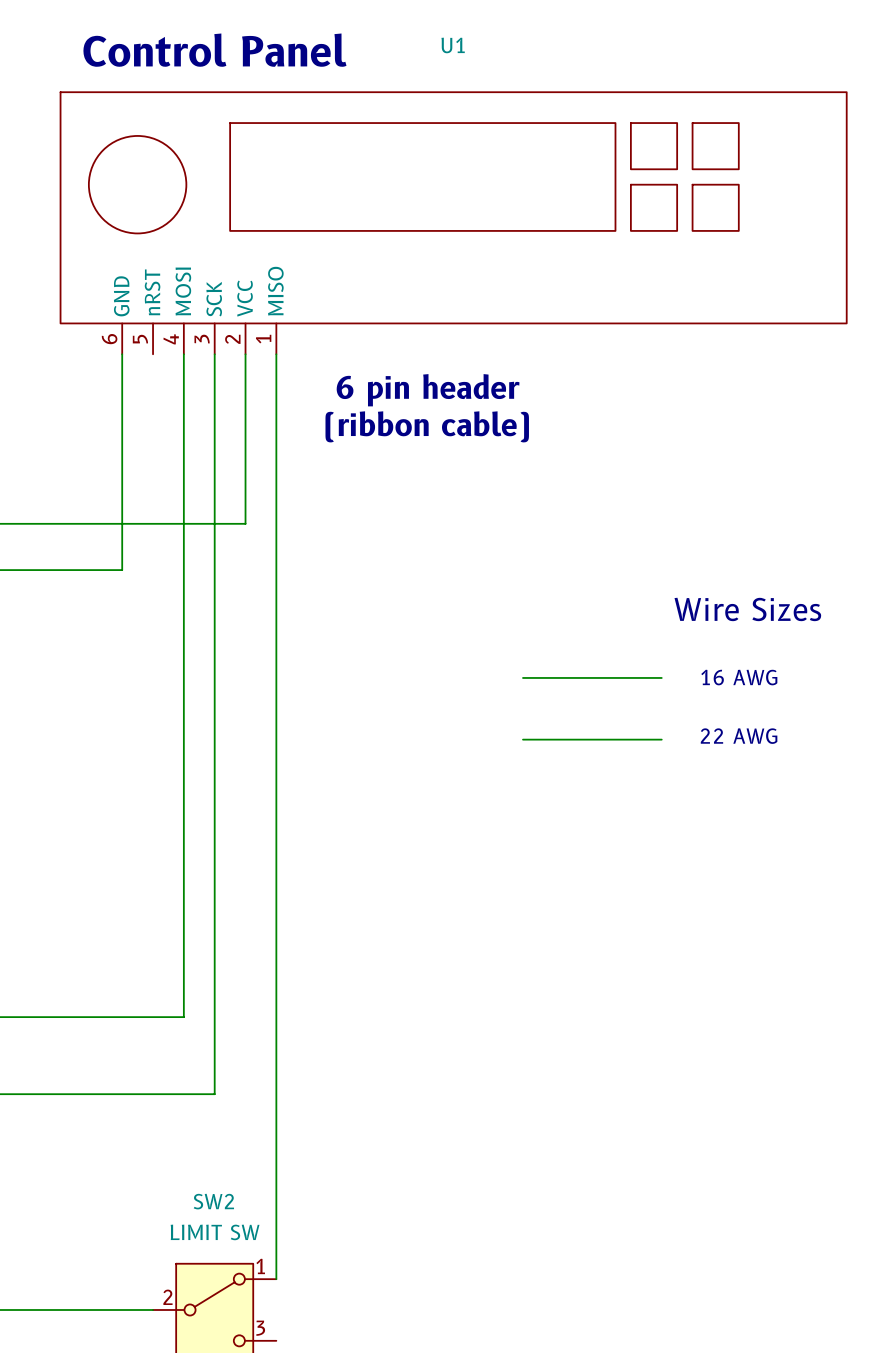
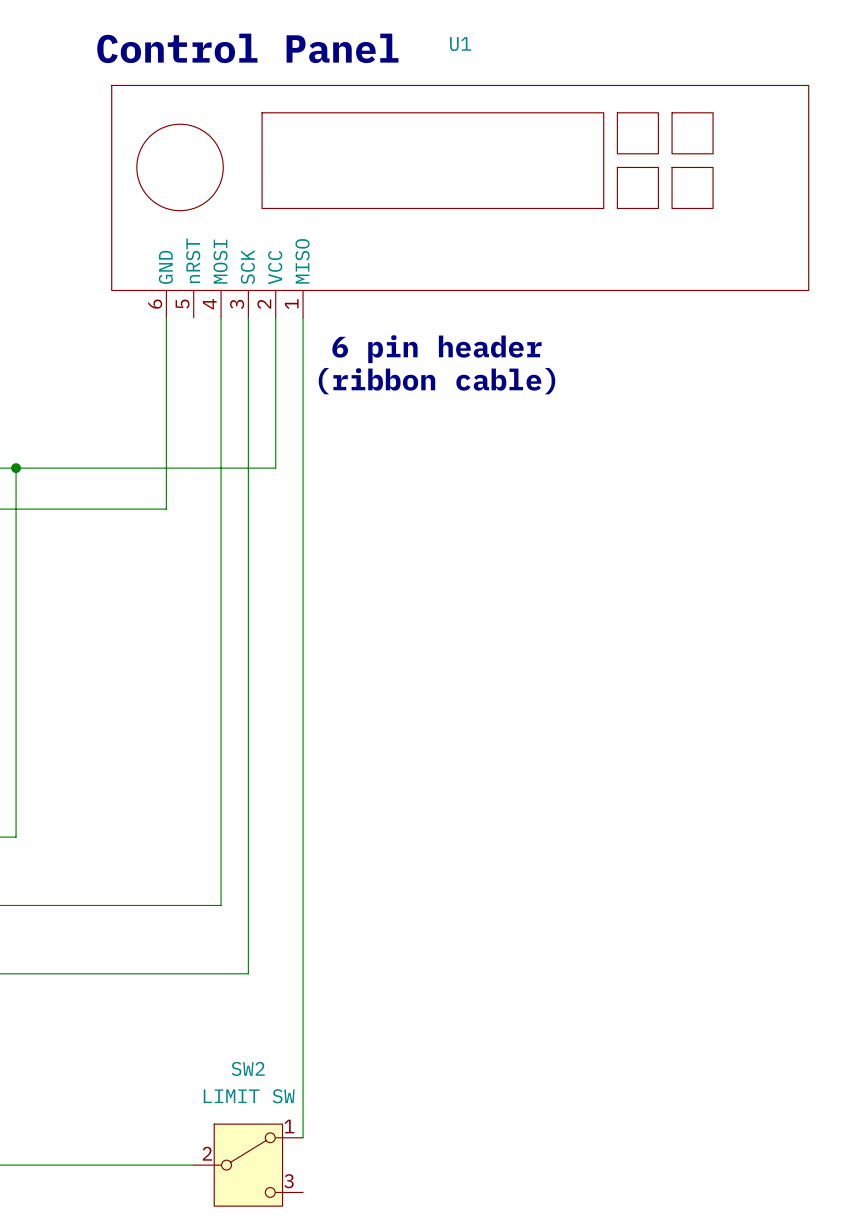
text: Wire Sizes (747, 609) -> none
wire: (522, 677) (661, 677) -> none
text: 16 AWG (739, 677) -> none
text: 22 AWG (739, 736) -> none
wire: (522, 739) (661, 739) -> none

